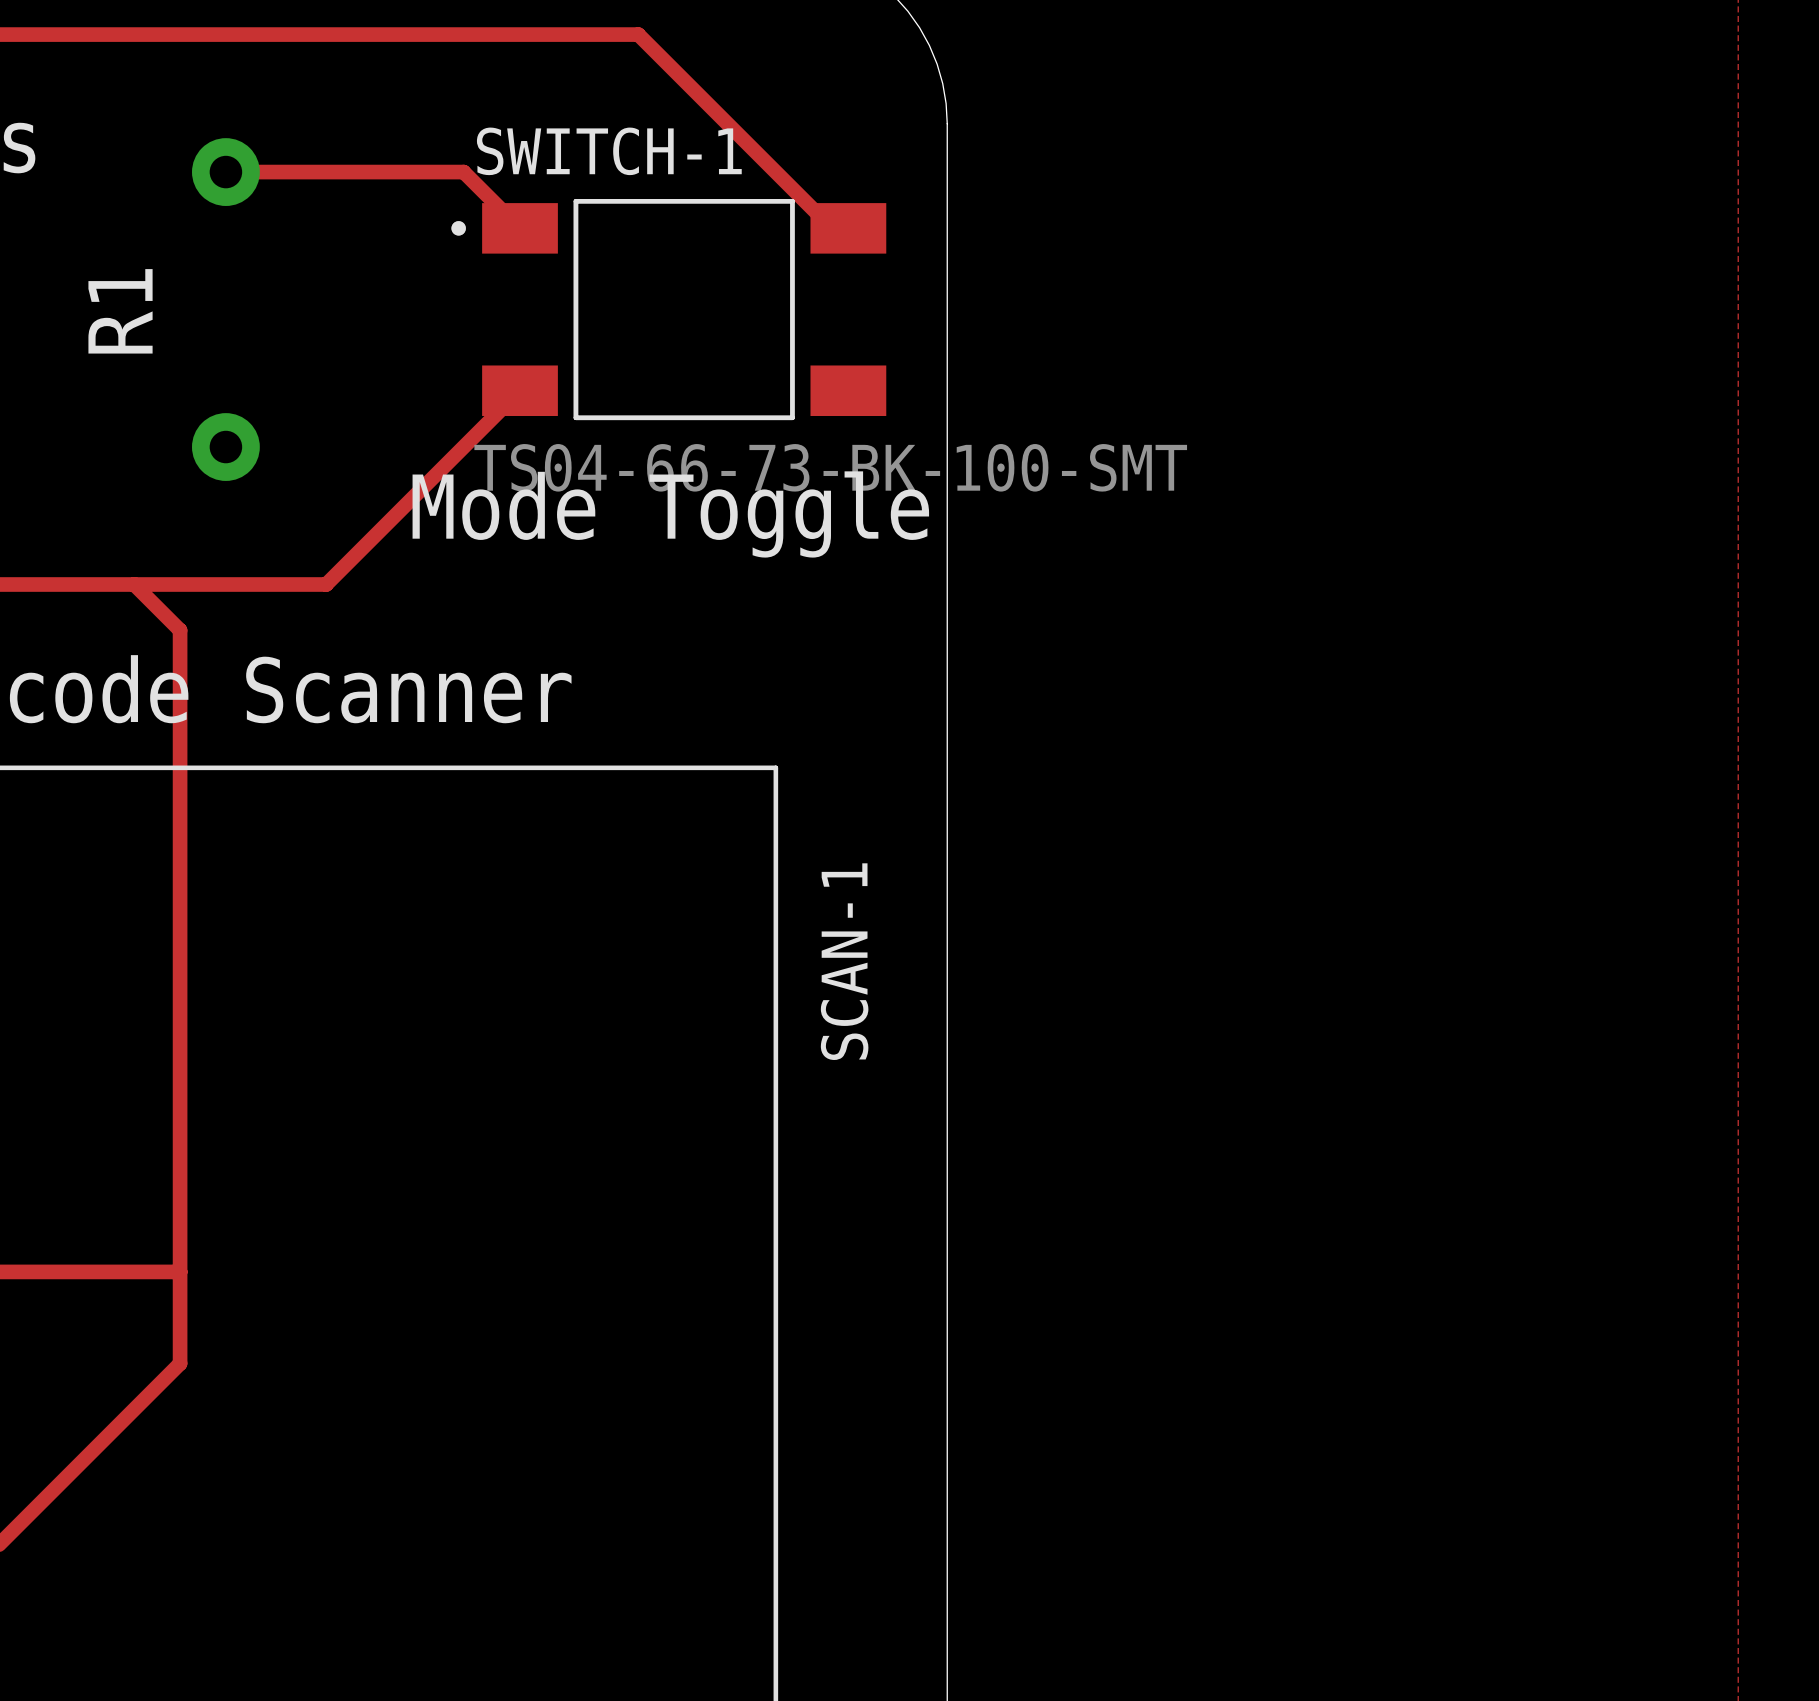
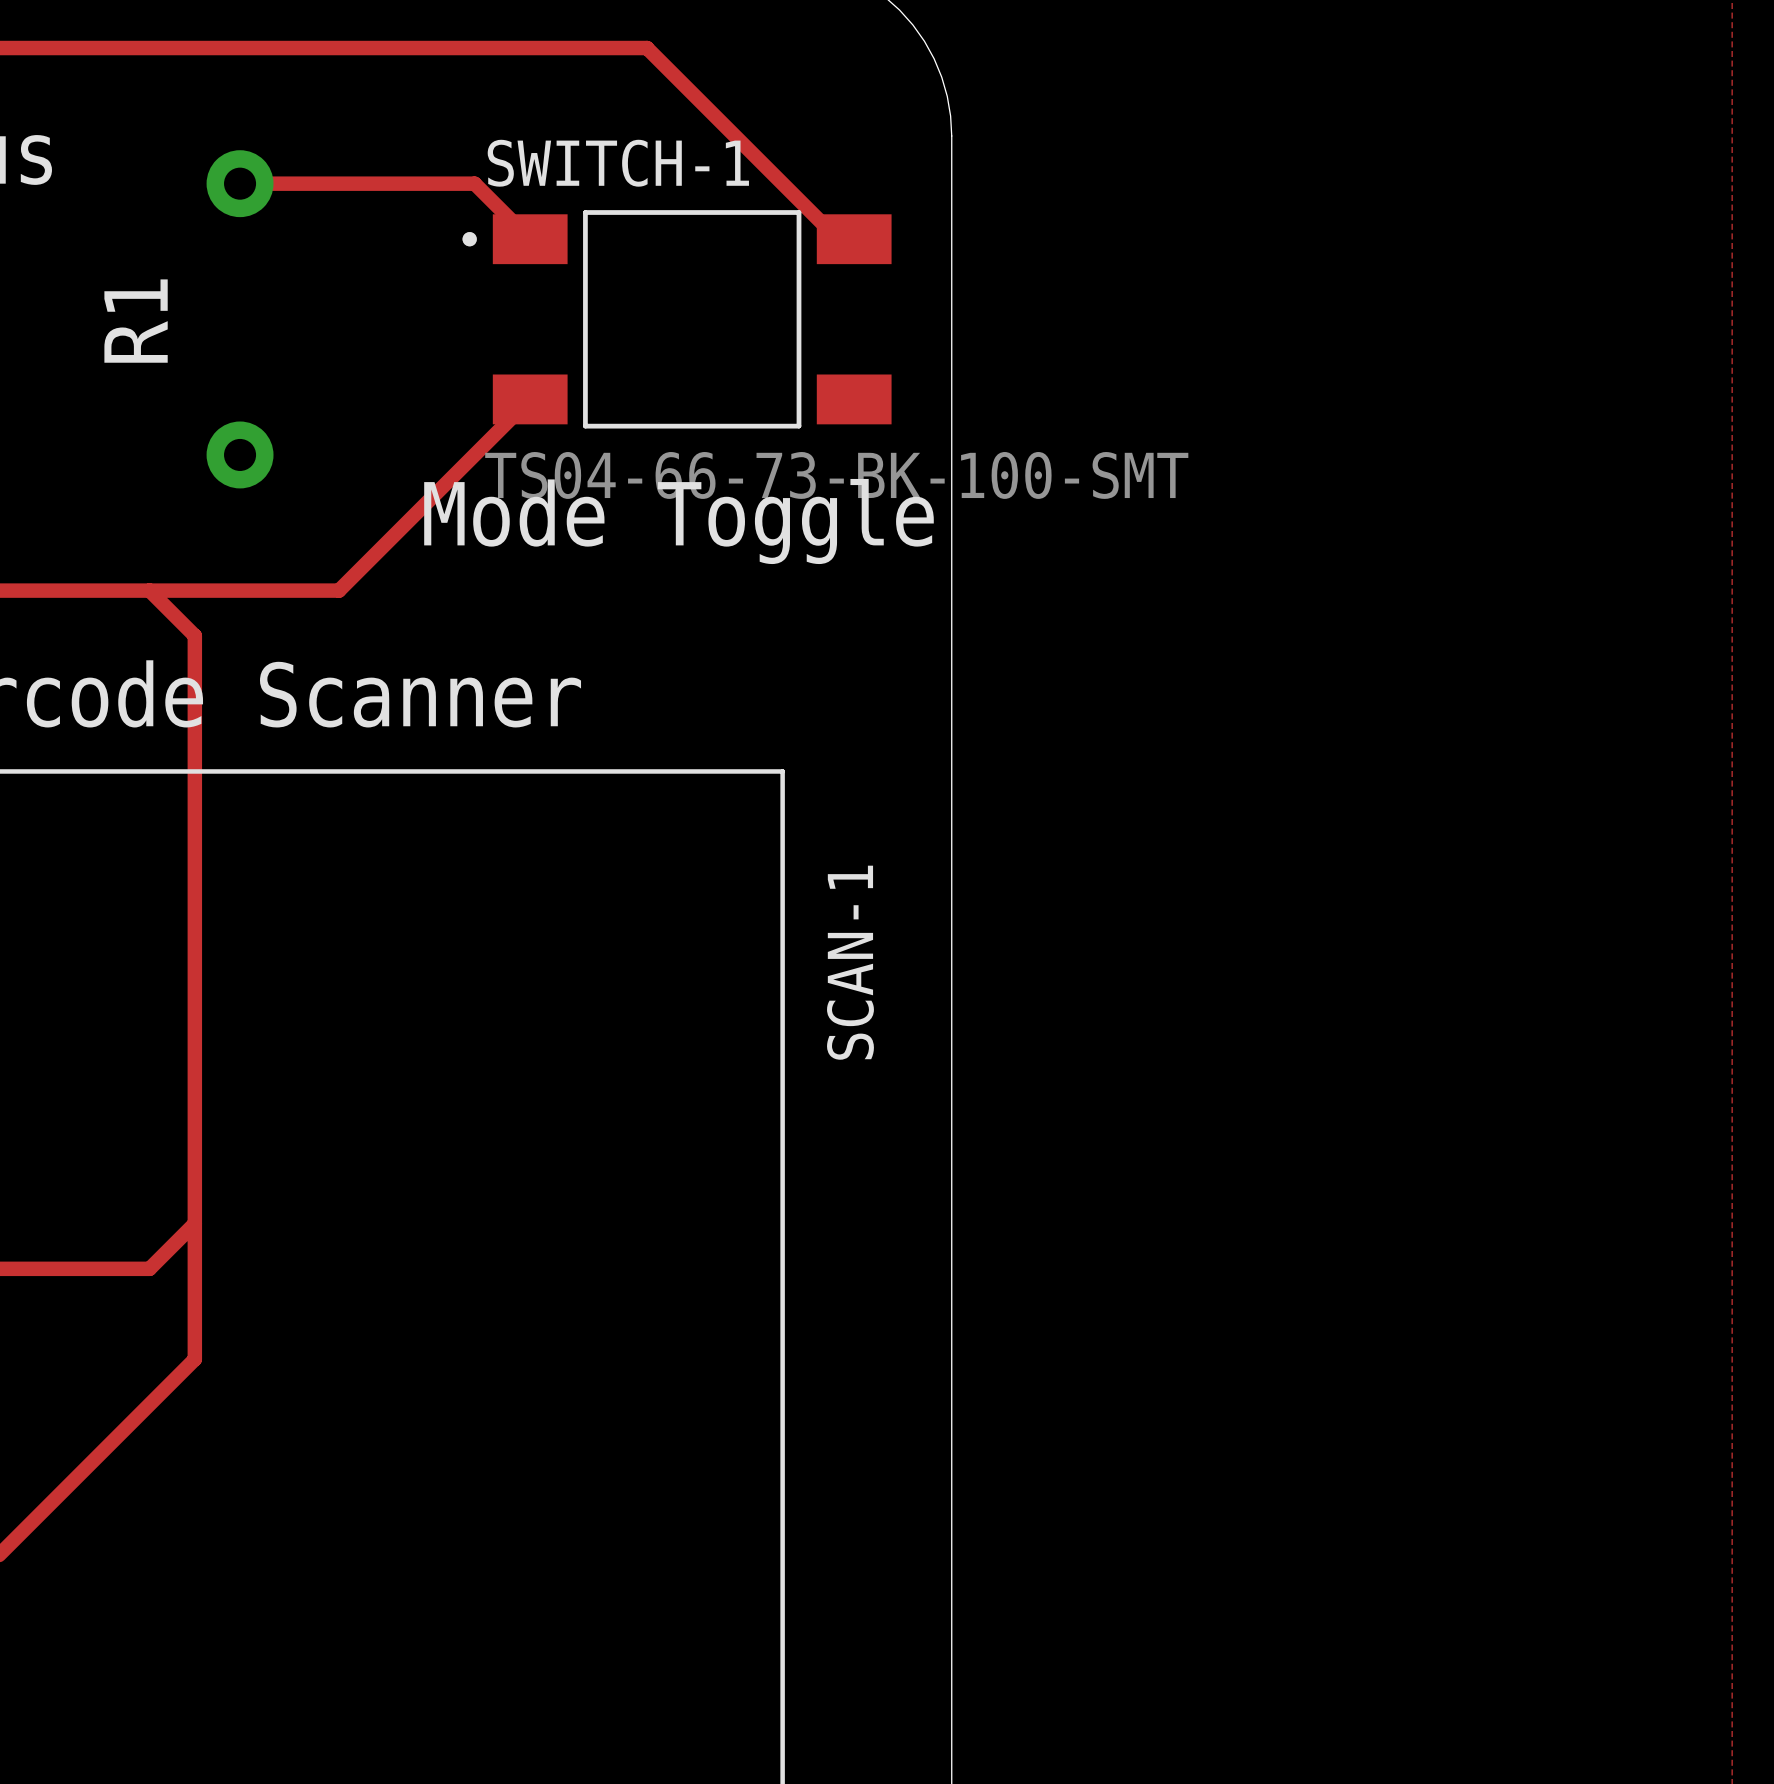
track: (134, 1271) (180, 1271) -> (149, 1268) (194, 1223)

